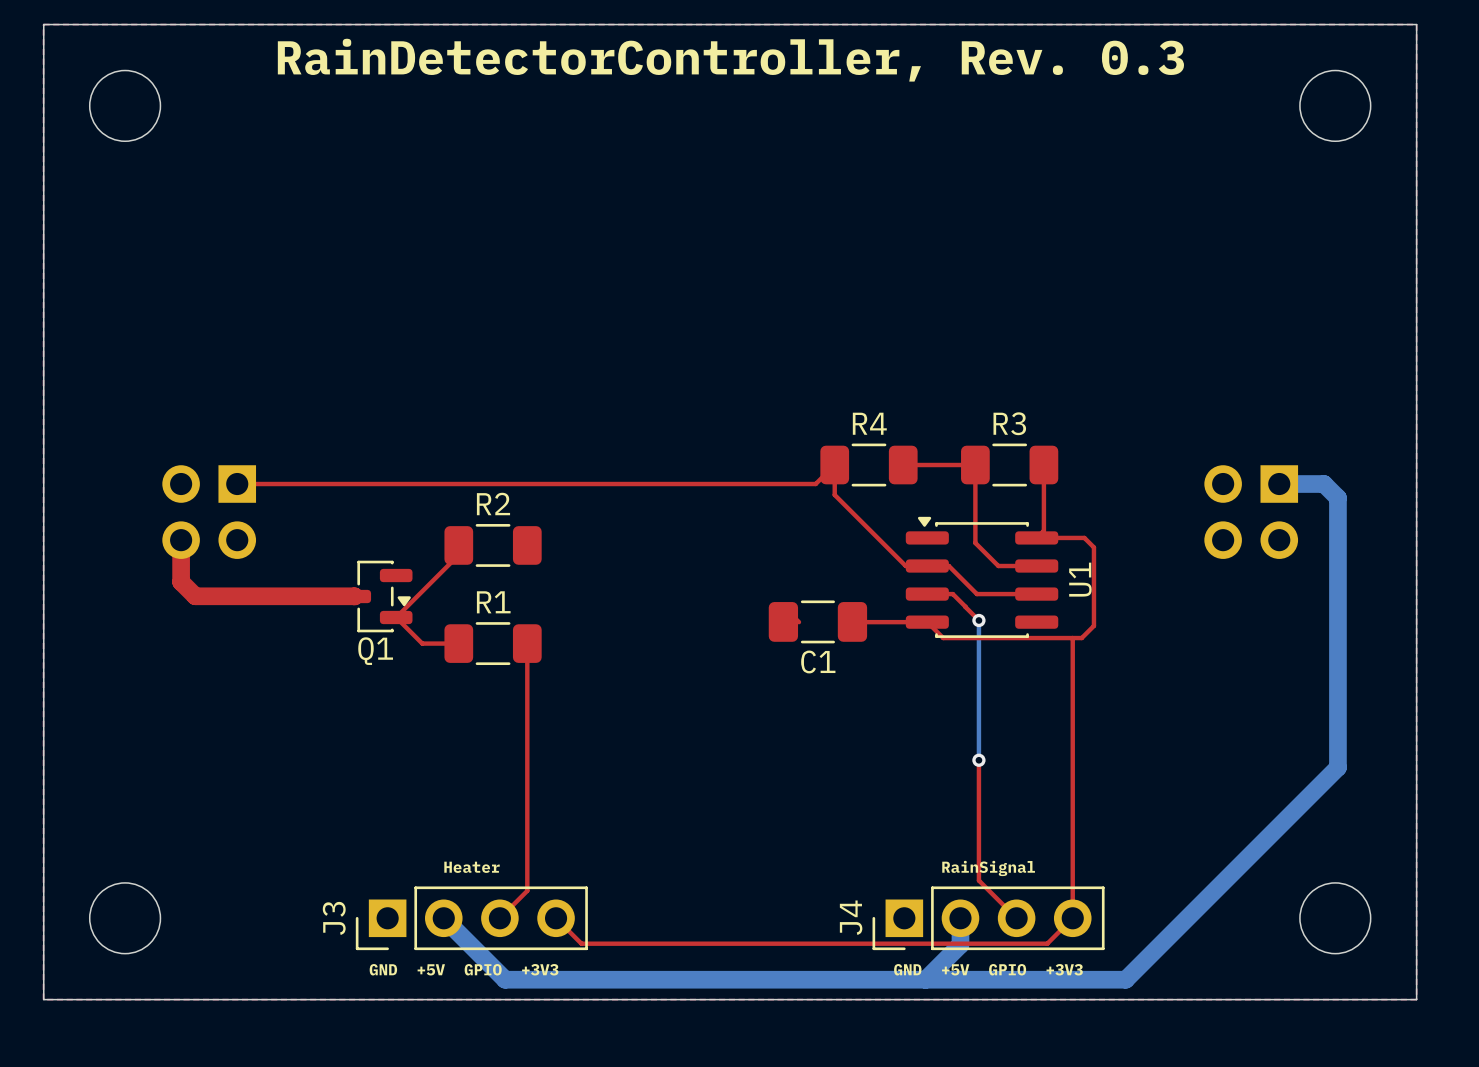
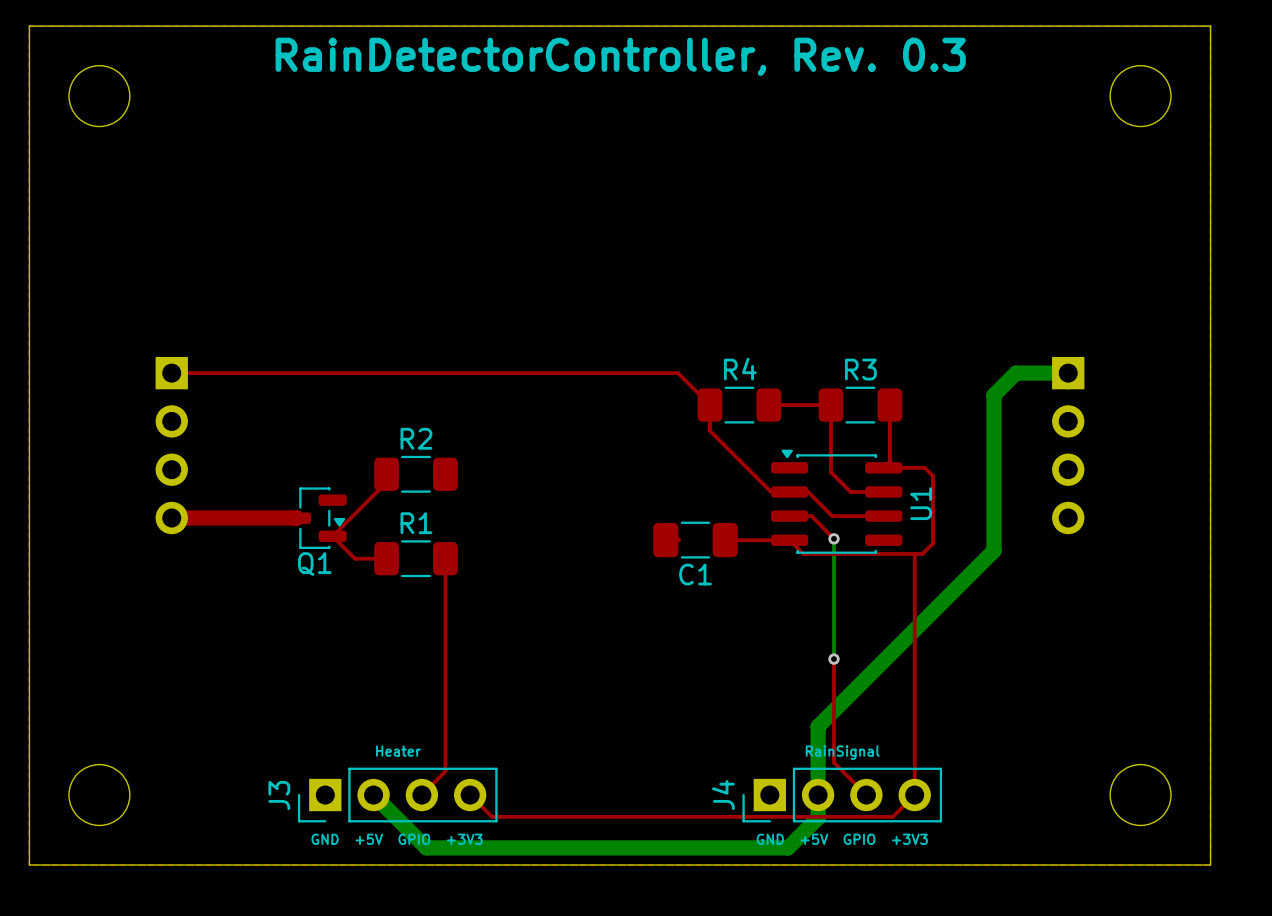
bottom track: none -> (1068, 382) (1068, 373) (1016, 373) (993, 395) (993, 550) (818, 726) (818, 795)
part footprint: [162, 465, 257, 559] -> [155, 356, 188, 535]
top track: (834, 465) (815, 484) (237, 484) (237, 481) -> (709, 405) (677, 373) (171, 373)
part footprint: [1204, 465, 1299, 559] -> [1052, 356, 1085, 535]
bottom track: (1279, 484) (1324, 484) (1337, 497) (1337, 767) (1125, 979) (925, 979) -> none
top track: (181, 540) (181, 582) (195, 596) (209, 596) -> none

